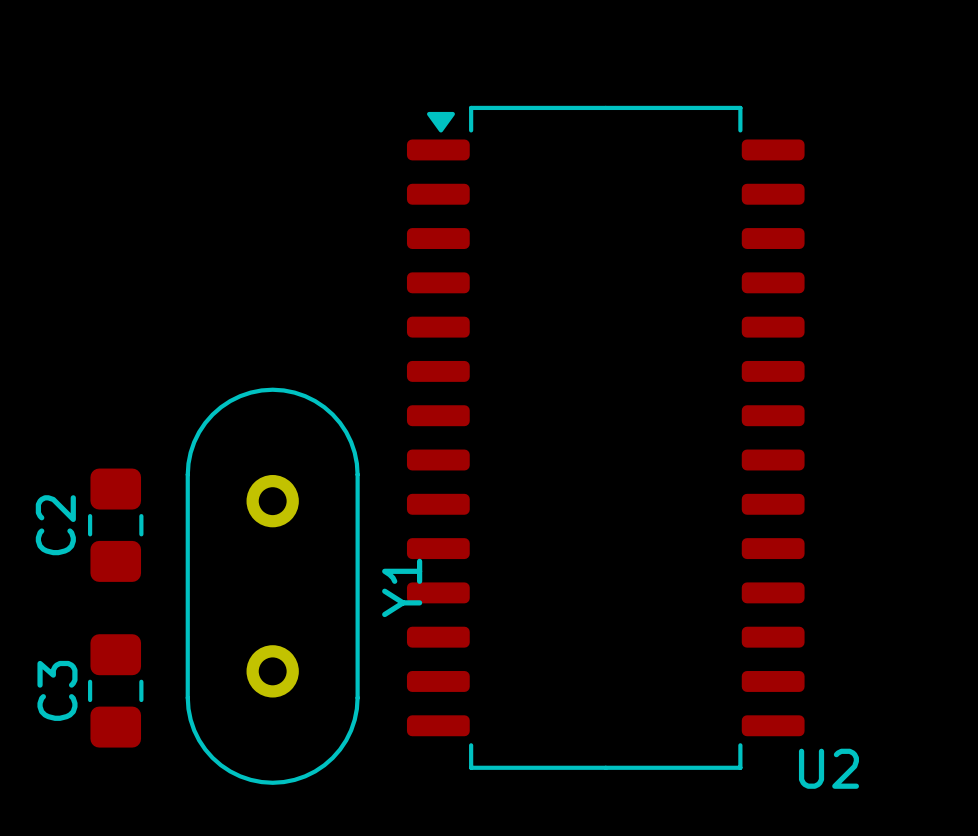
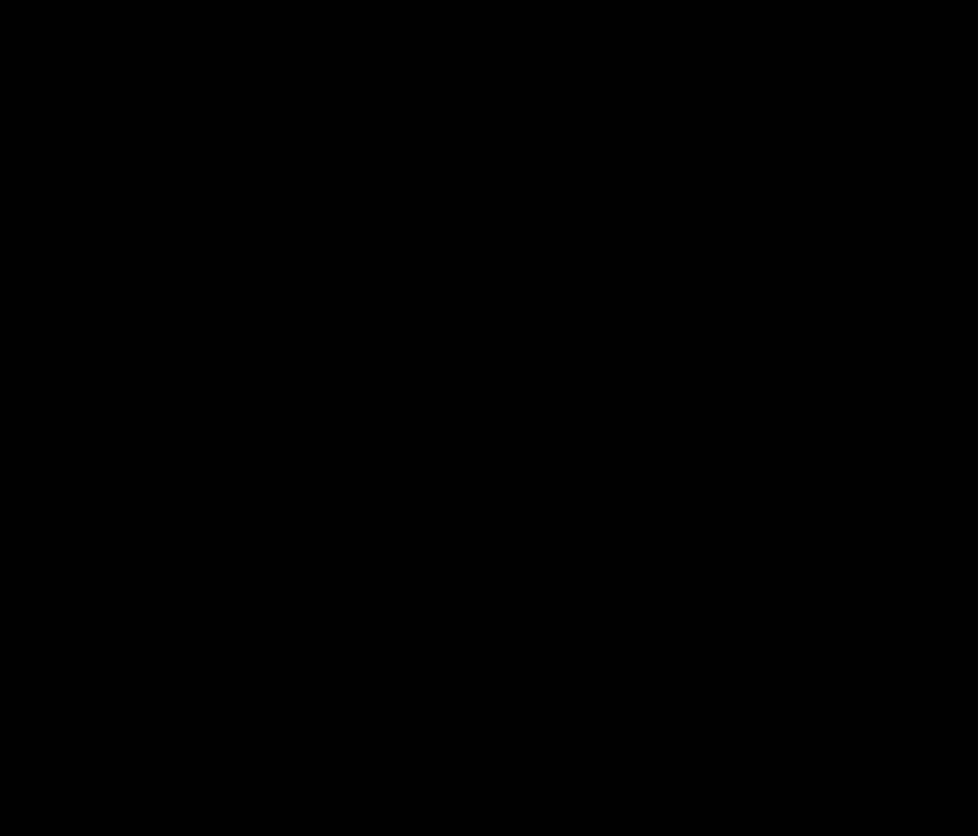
U2: (605, 437) -> none
C2: (115, 525) -> none
Y1: (272, 586) -> none
C3: (115, 690) -> none

